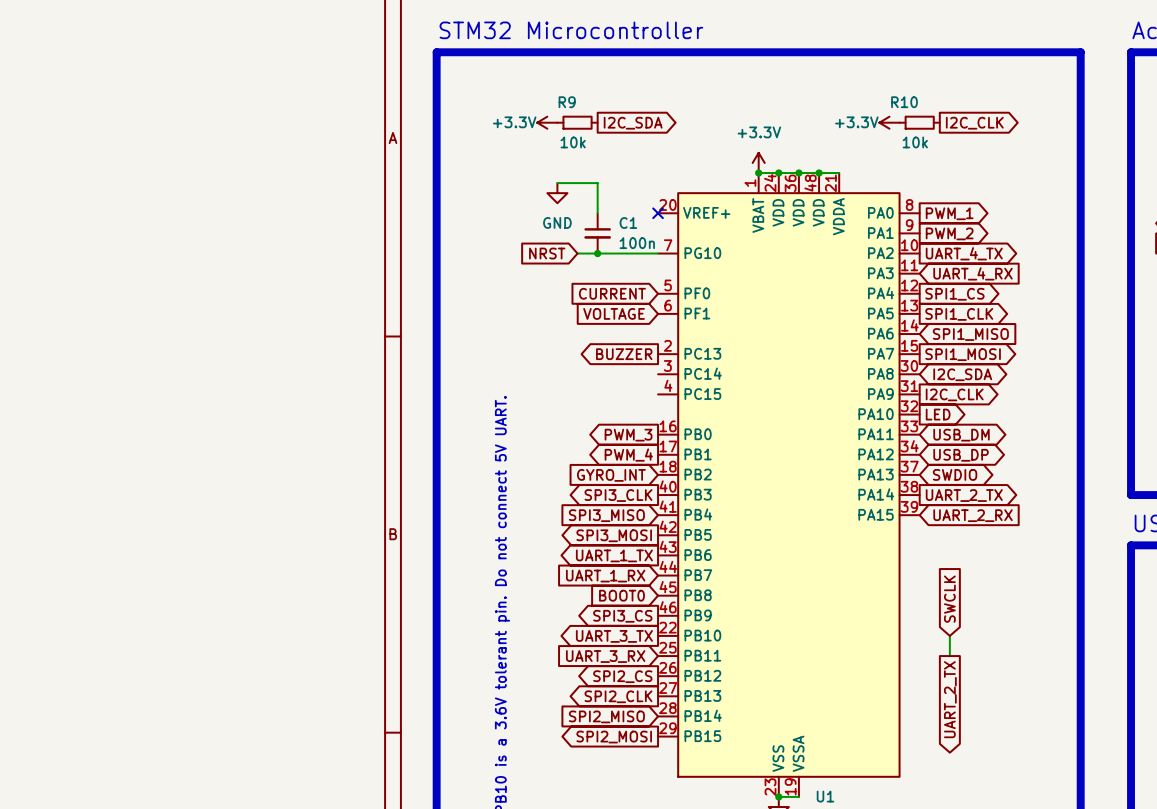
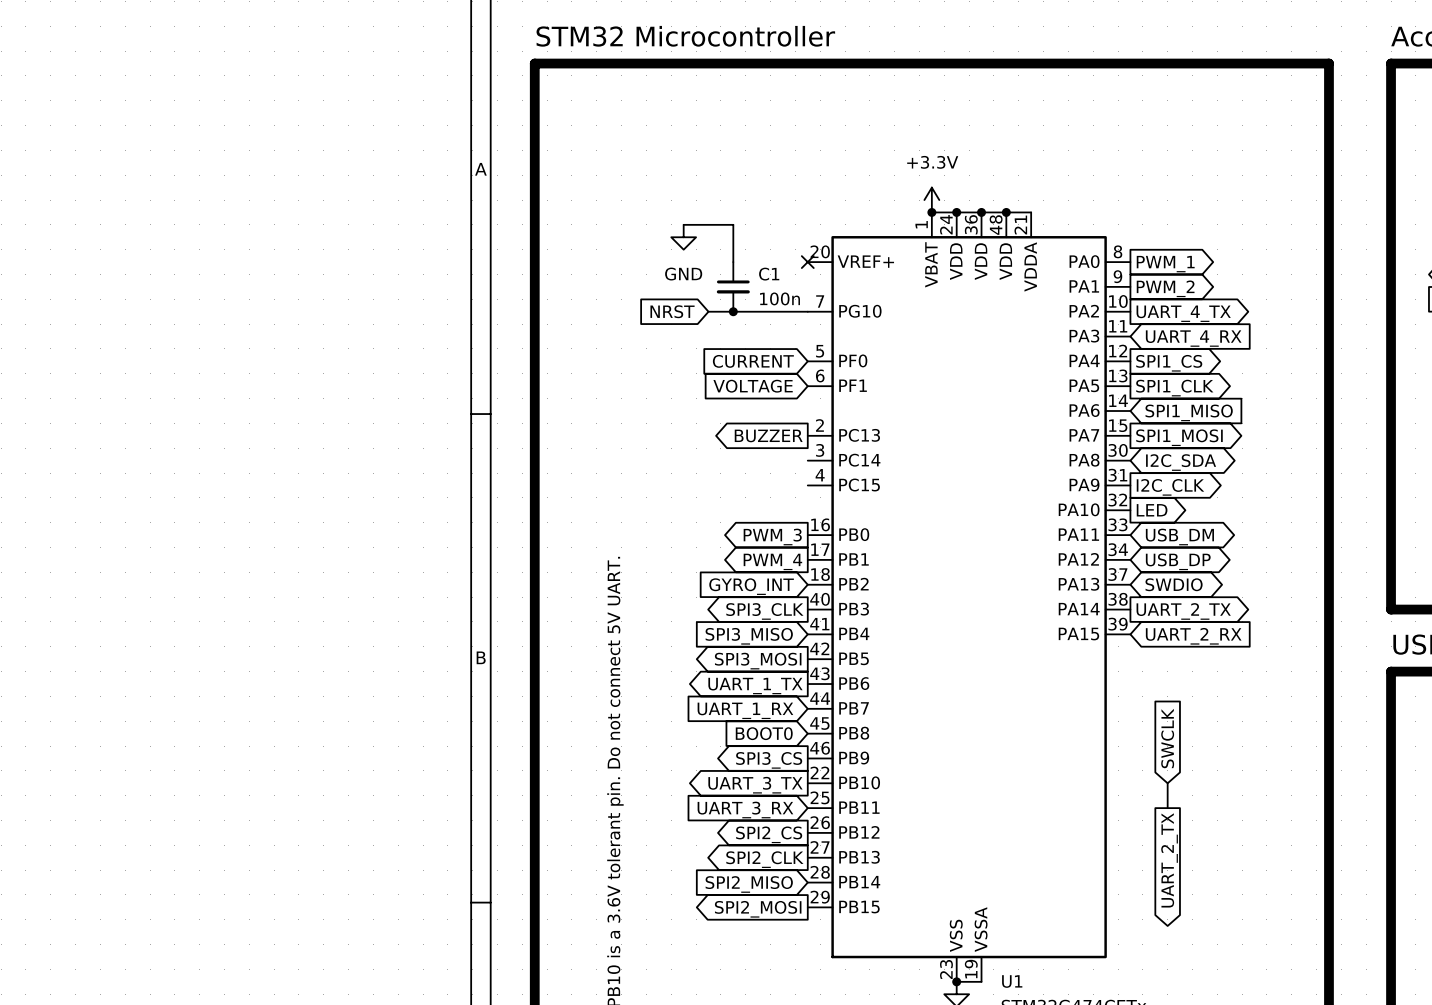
power symbol: +3.3V (547, 122) -> none
R9: 10k (577, 122) -> none
power symbol: +3.3V (889, 122) -> none
R10: 10k (919, 122) -> none
global label: I2C_SDA (633, 123) -> none
global label: I2C_CLK (974, 123) -> none

